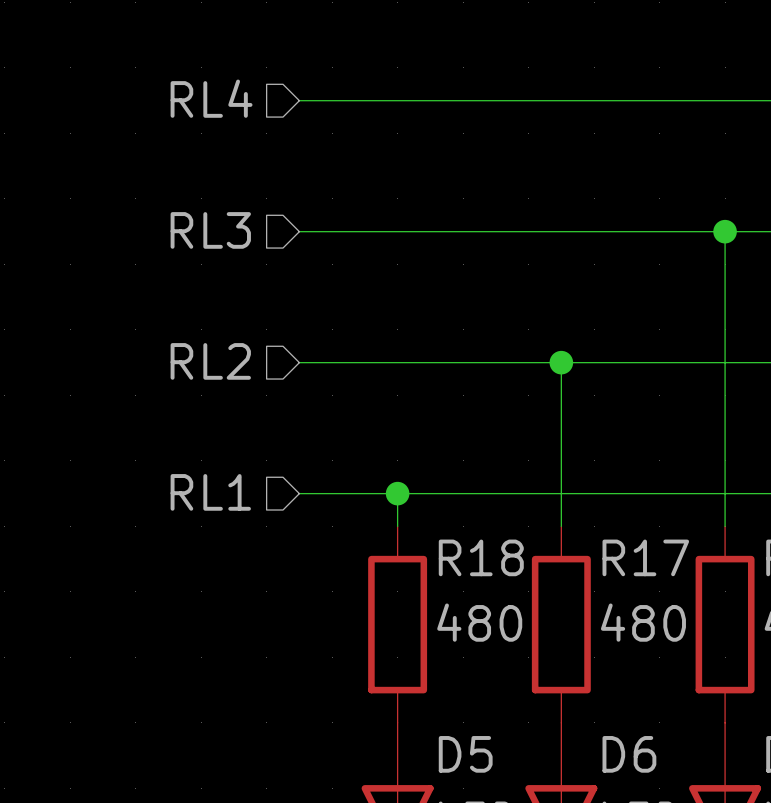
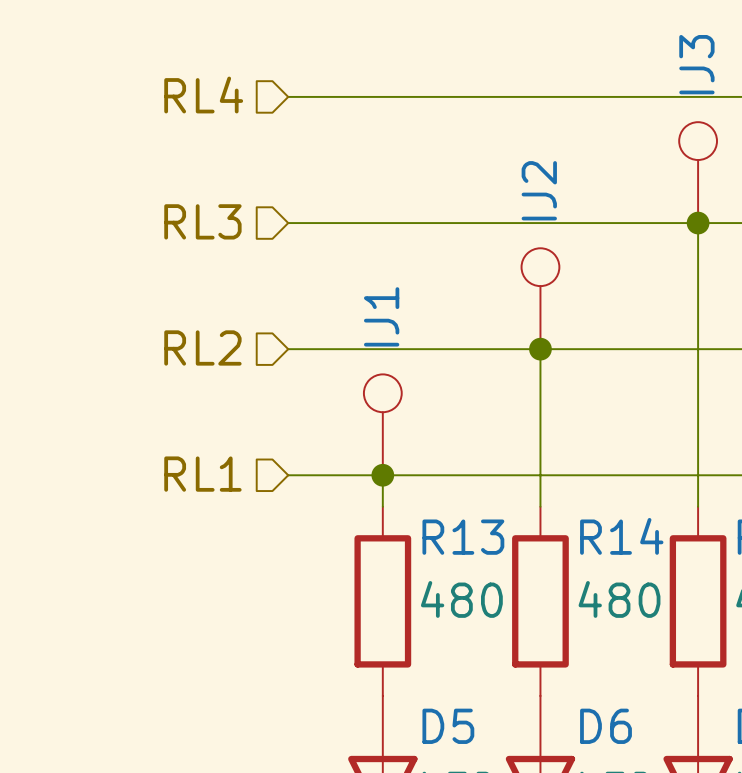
IJ3: none -> (698, 172)
IJ2: none -> (540, 298)
IJ1: none -> (382, 424)
R18 name: R18 (481, 557) -> R13 (463, 537)
R17 name: R17 (645, 557) -> R14 (621, 536)

